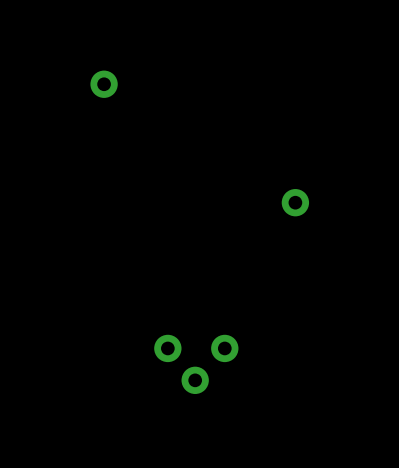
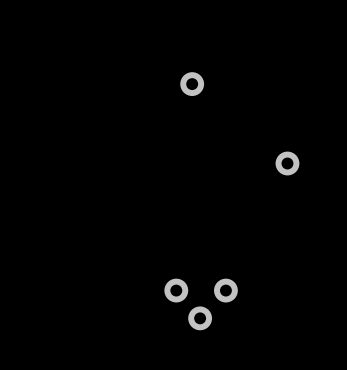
via position: (104, 84) -> (192, 84)

